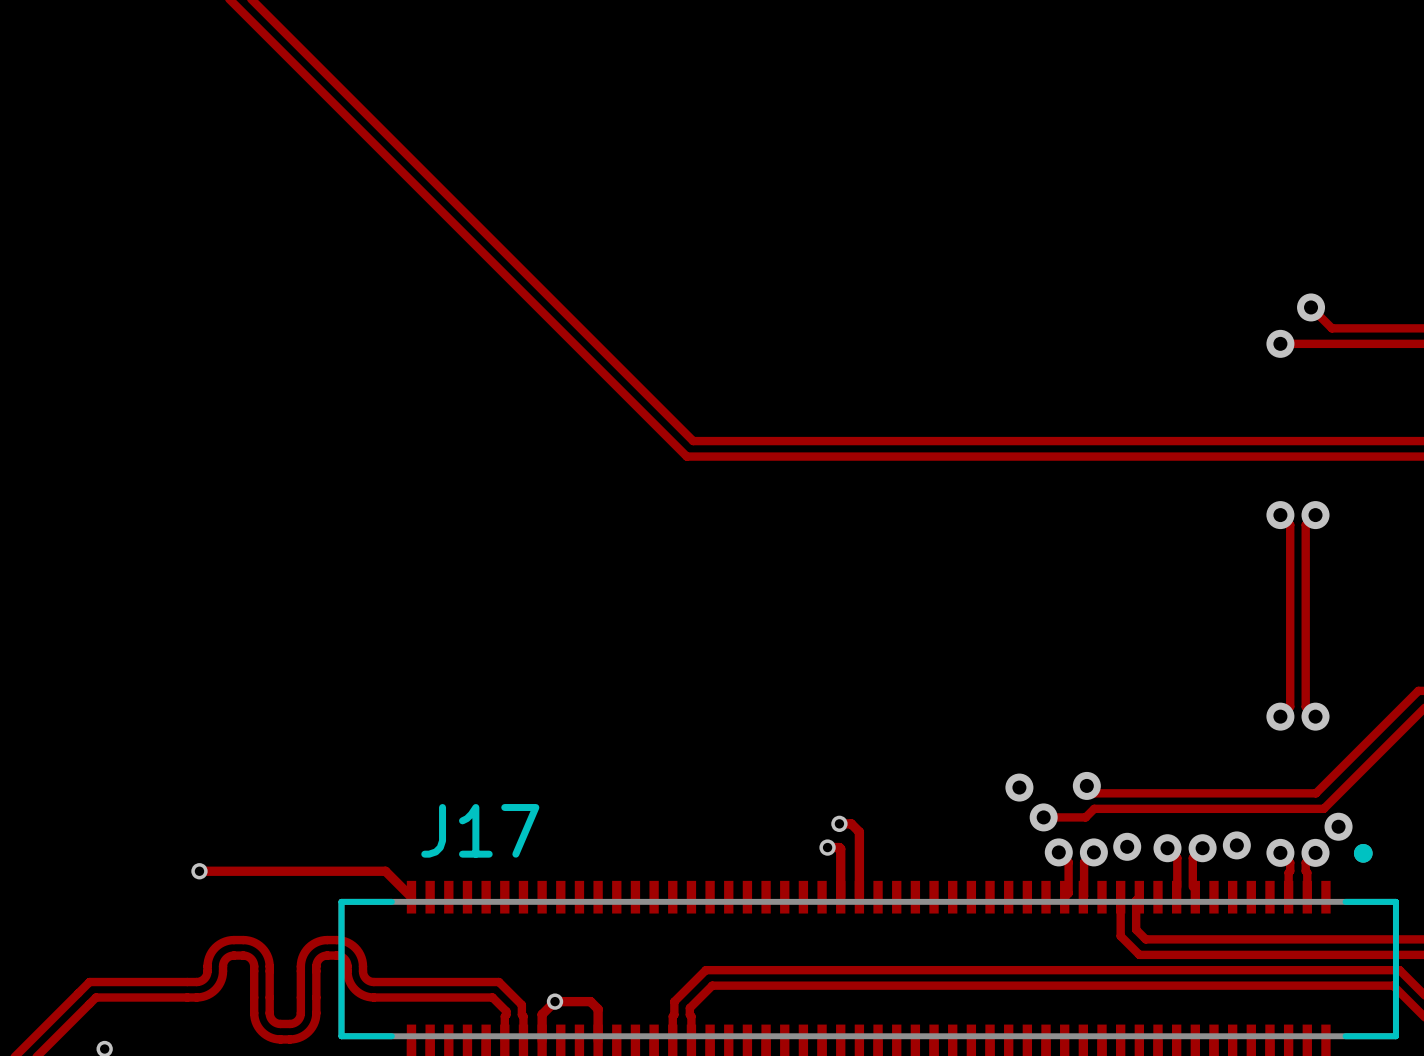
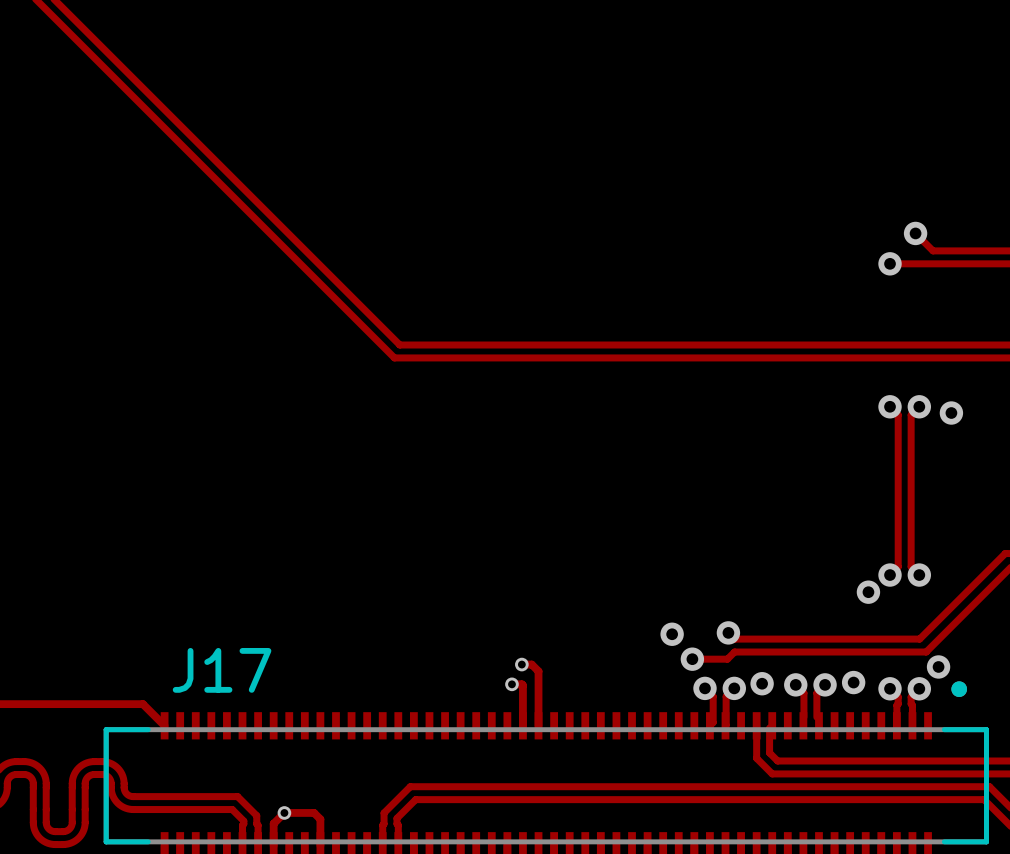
via: none -> (951, 413)
via: none -> (868, 592)

